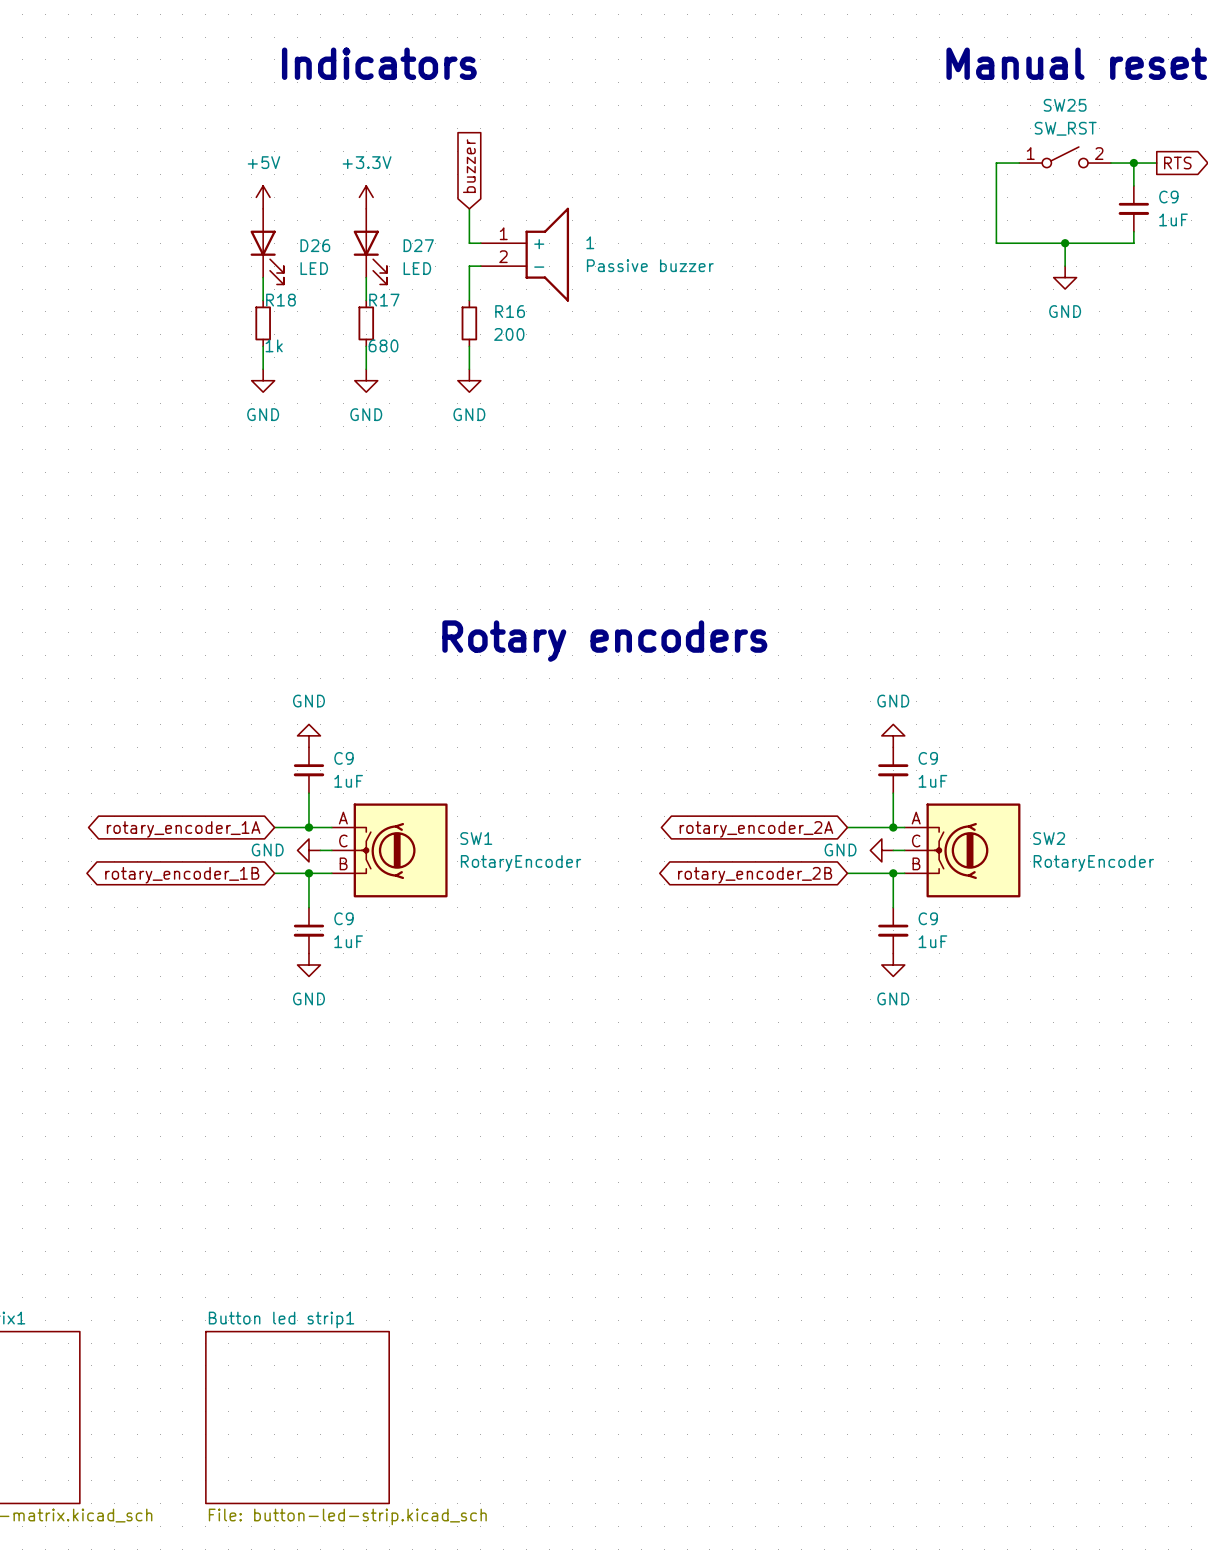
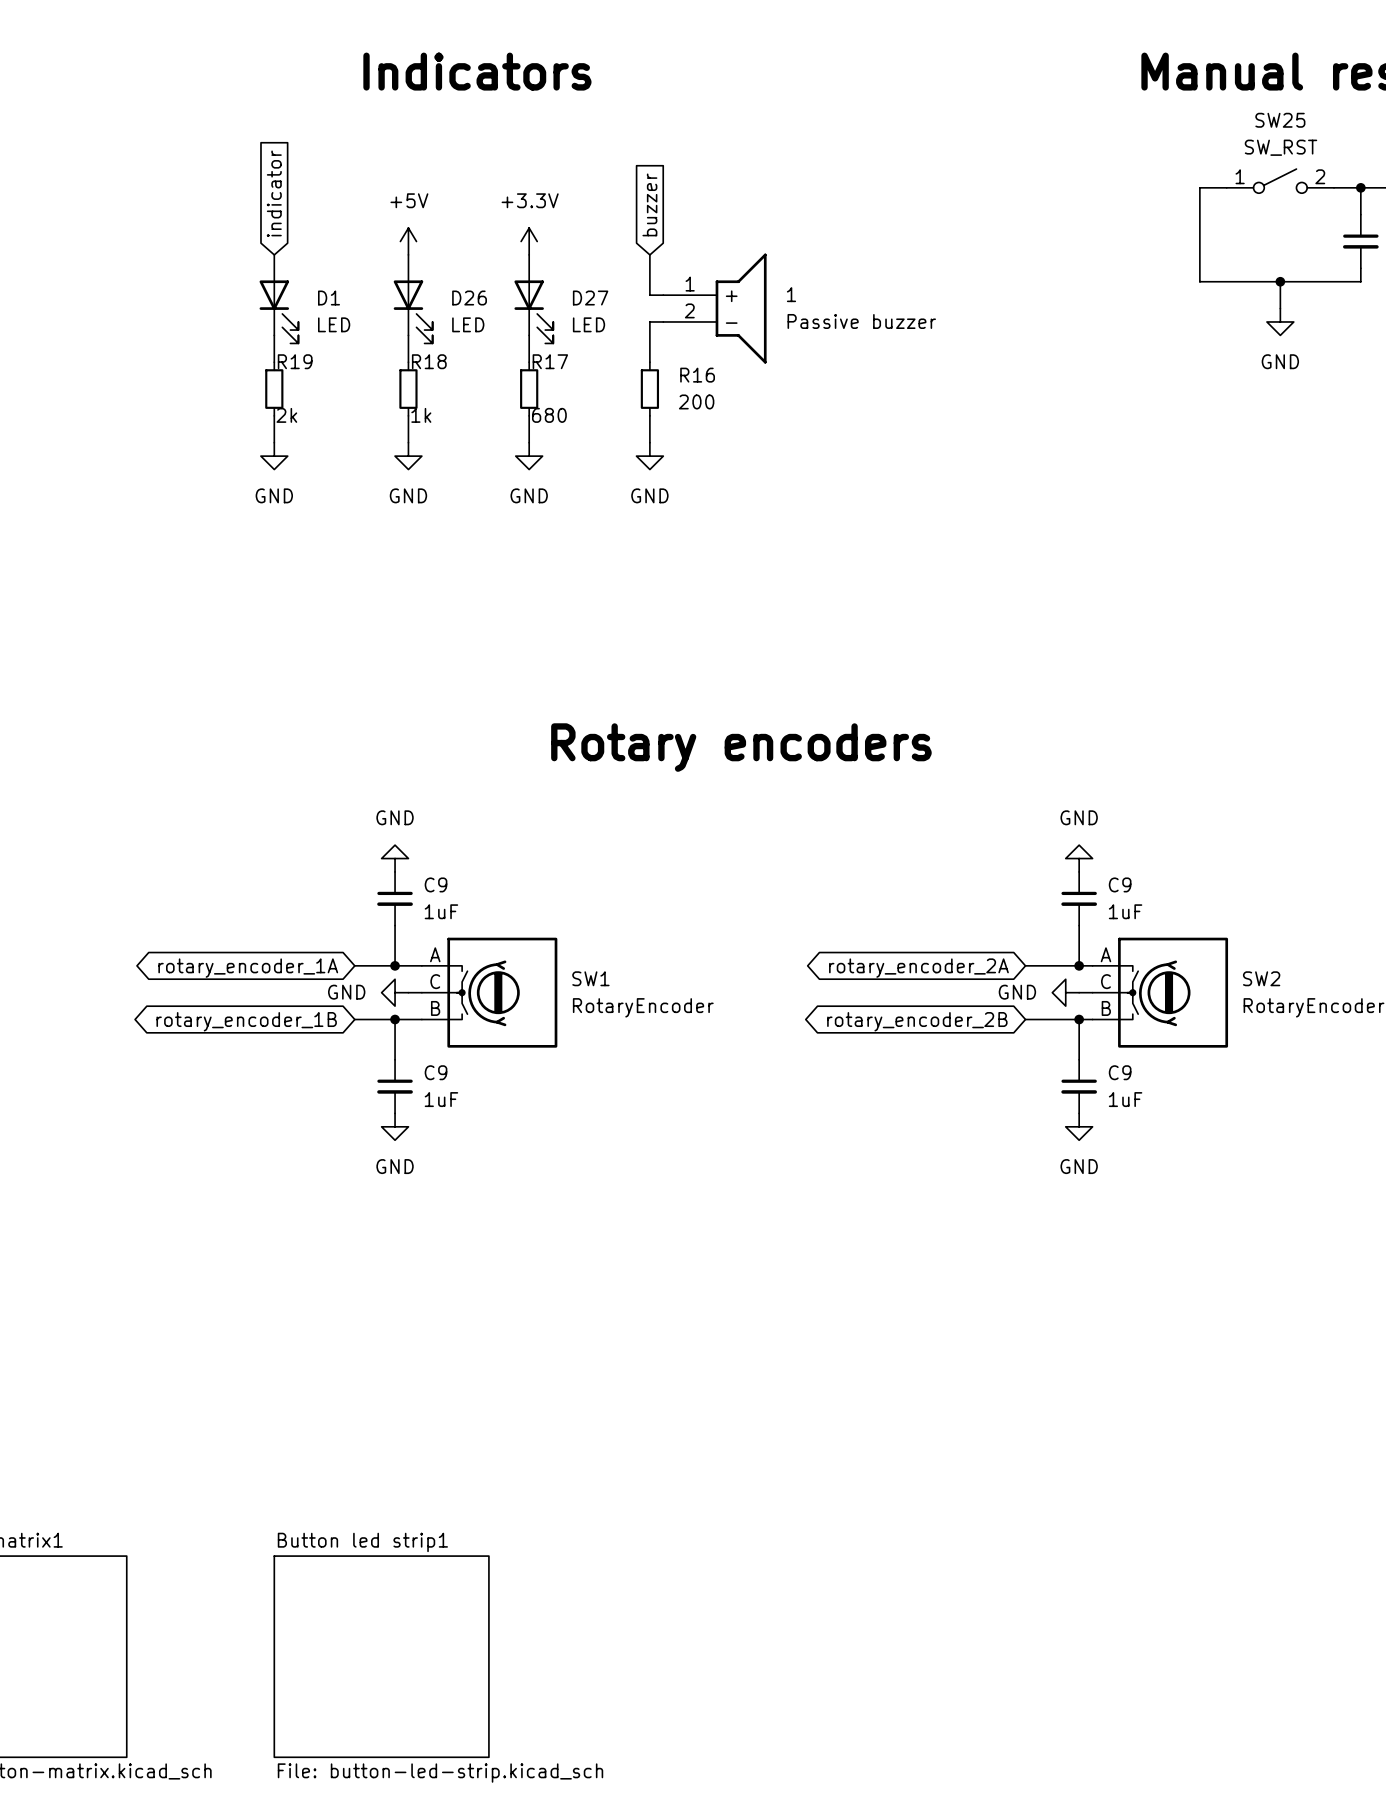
global label position: buzzer (469, 166) -> buzzer (649, 204)
global label: none -> indicator (274, 193)
power symbol position: +5V (263, 197) -> +5V (408, 241)
power symbol position: +3.3V (366, 197) -> +3.3V (529, 241)
wire: (469, 208) (469, 243) (480, 243) -> (649, 254) (649, 295) (663, 295)
D26 position: (267, 246) -> (413, 299)
D27 position: (370, 246) -> (533, 299)
1 position: (524, 254) -> (714, 308)
D1: none -> LED (279, 299)
wire: (480, 266) (469, 266) (469, 300) -> (663, 321) (649, 321) (649, 362)
wire: (263, 277) (263, 300) -> (408, 335) (408, 362)
wire: (366, 277) (366, 300) -> (529, 335) (529, 362)
wire: none -> (274, 335) (274, 362)
R18 position: (263, 323) -> (408, 389)
R17 position: (366, 323) -> (529, 389)
R16 position: (469, 323) -> (649, 389)
R19: none -> 2k (274, 389)
wire: (263, 346) (263, 369) -> (408, 415) (408, 442)
wire: (366, 346) (366, 369) -> (529, 415) (529, 442)
wire: (469, 346) (469, 369) -> (649, 415) (649, 442)
wire: none -> (274, 415) (274, 442)
power symbol: GND (263, 380) -> none
power symbol: GND (366, 380) -> none
power symbol: GND (469, 380) -> none
power symbol: none -> GND (274, 456)
power symbol: none -> GND (408, 456)
power symbol: none -> GND (529, 456)
power symbol: none -> GND (649, 456)

